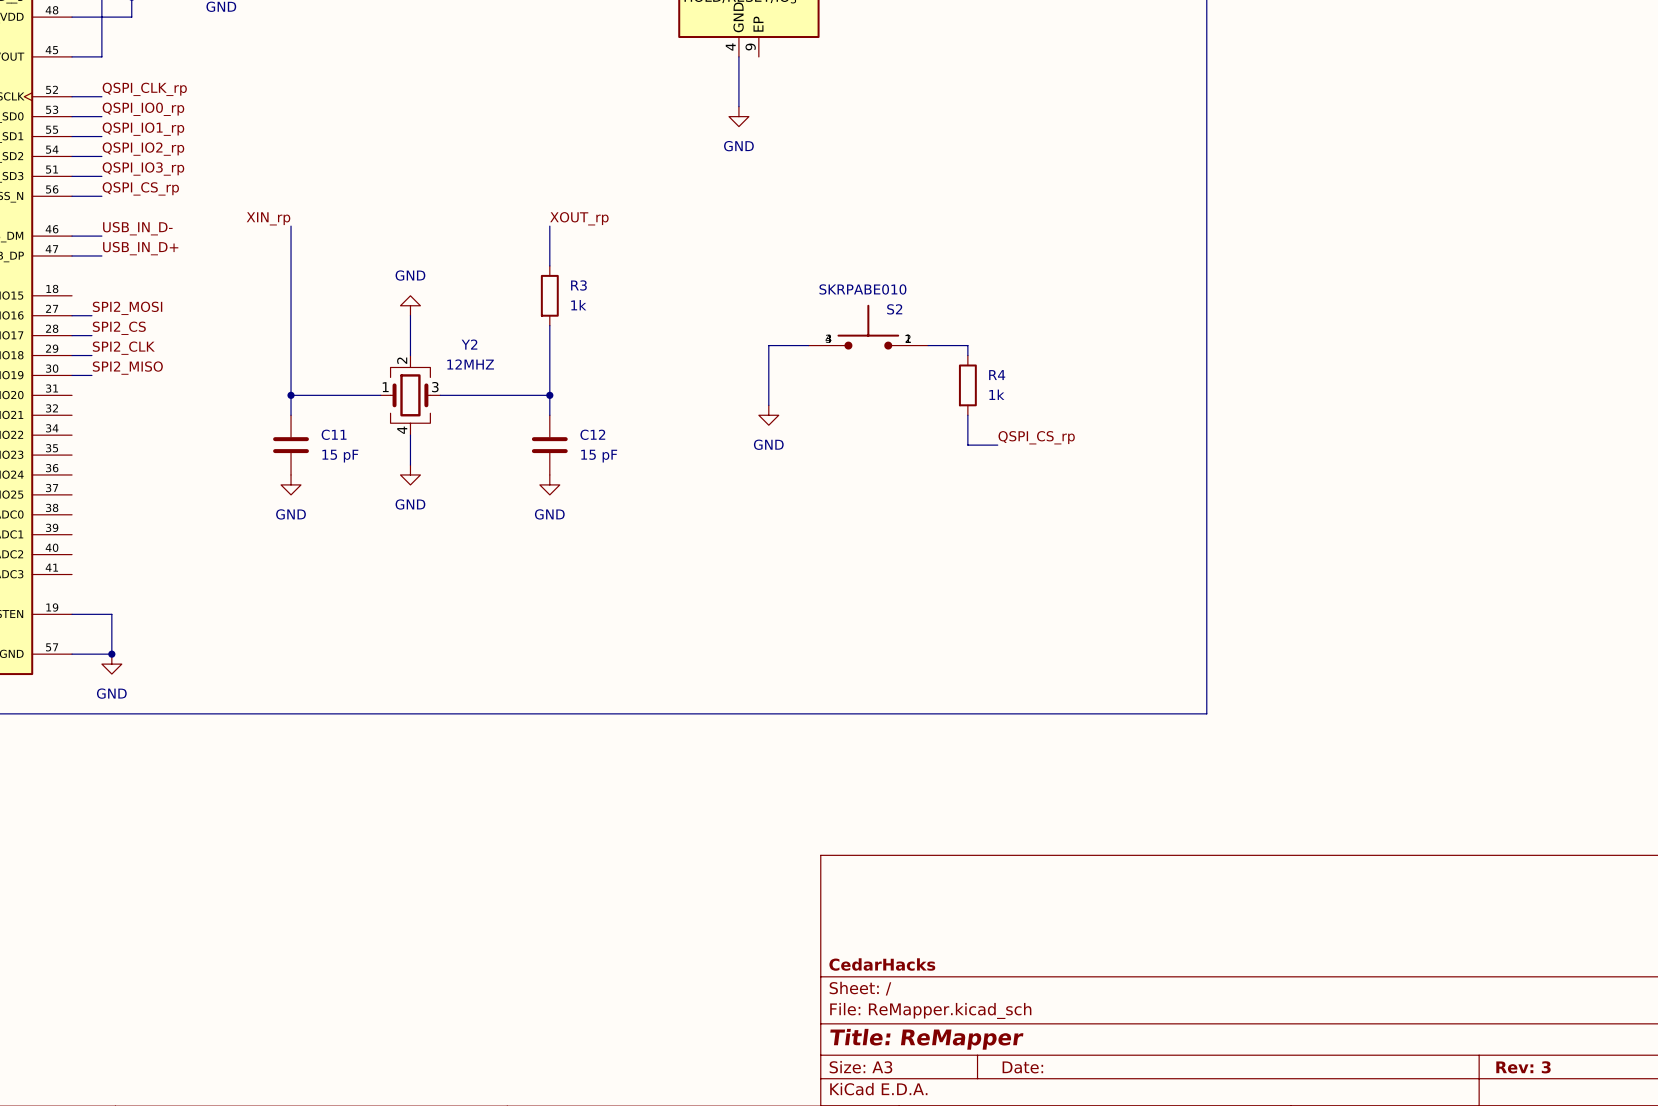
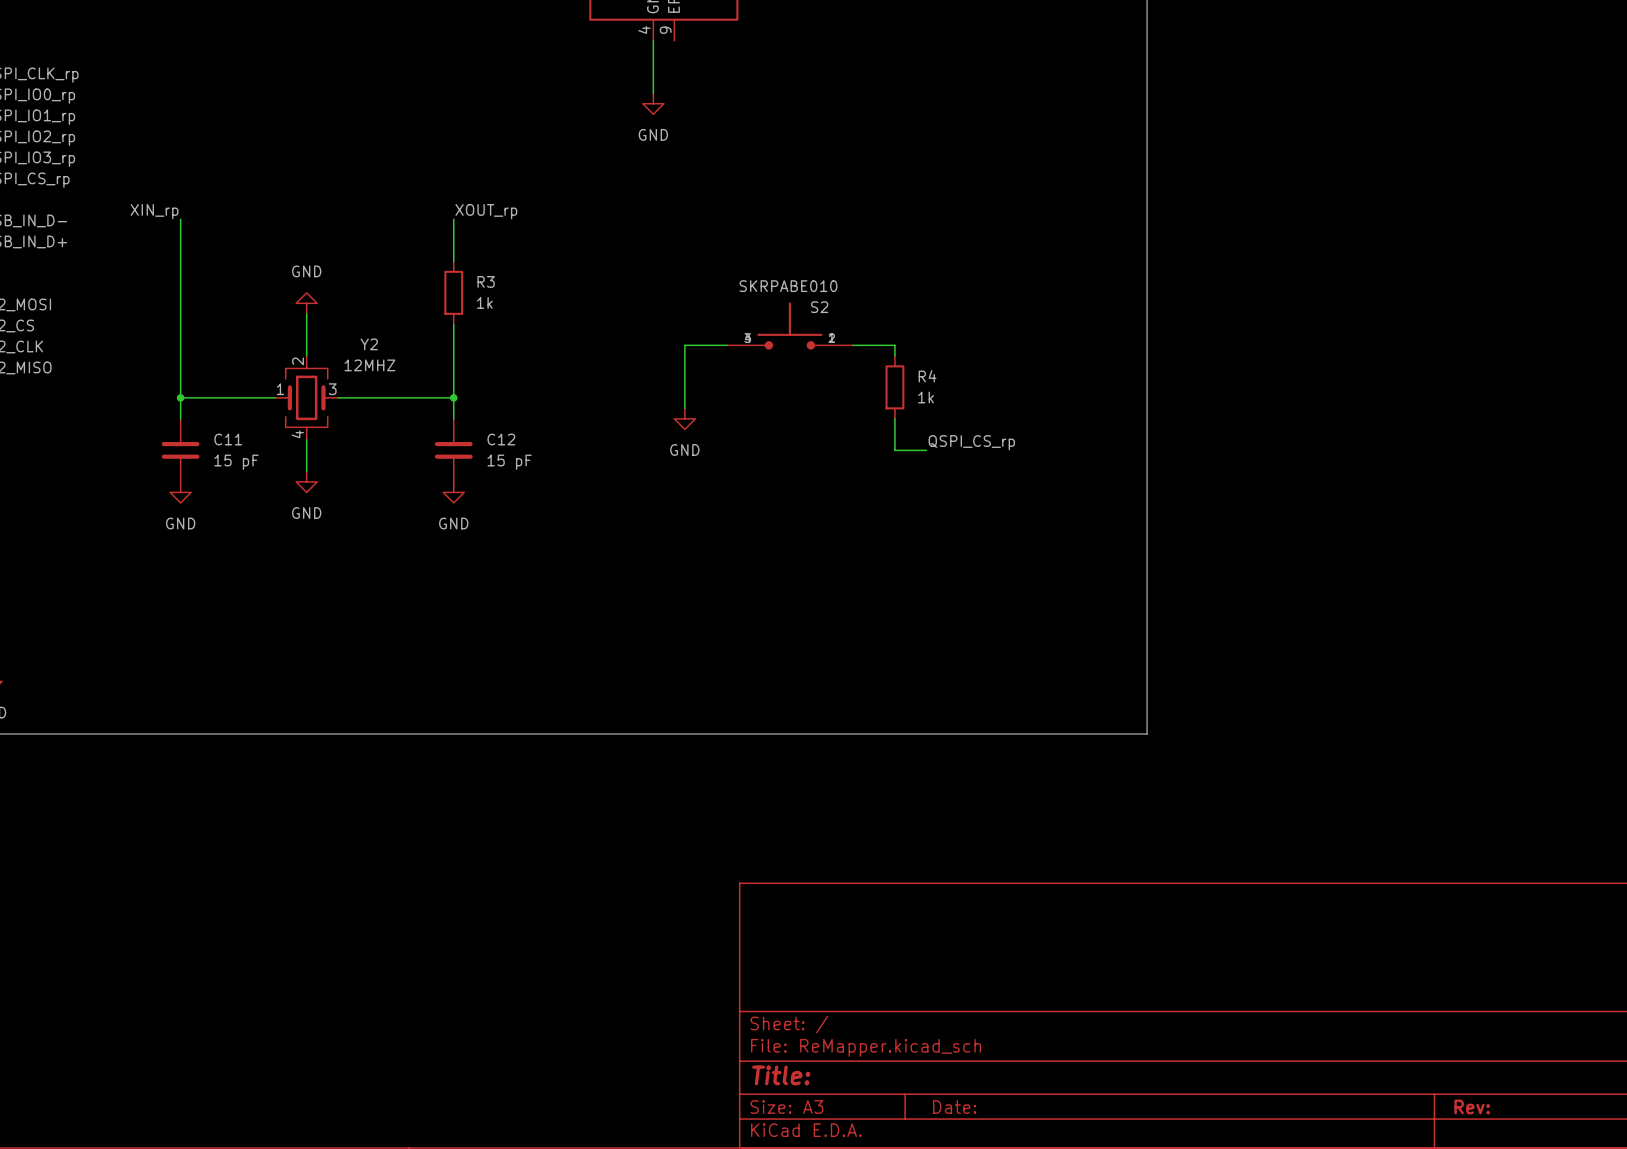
title block: CedarHacks (882, 964) -> none
title block: Title: ReMapper (926, 1039) -> Title: (781, 1075)
title block: Rev: 3 (1523, 1067) -> Rev: (1472, 1106)

